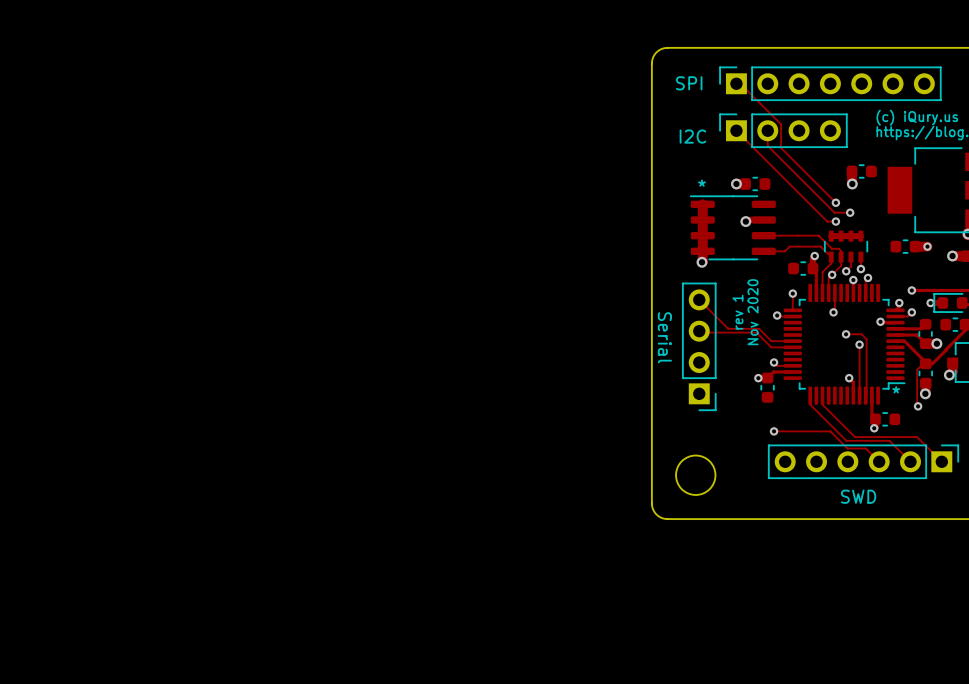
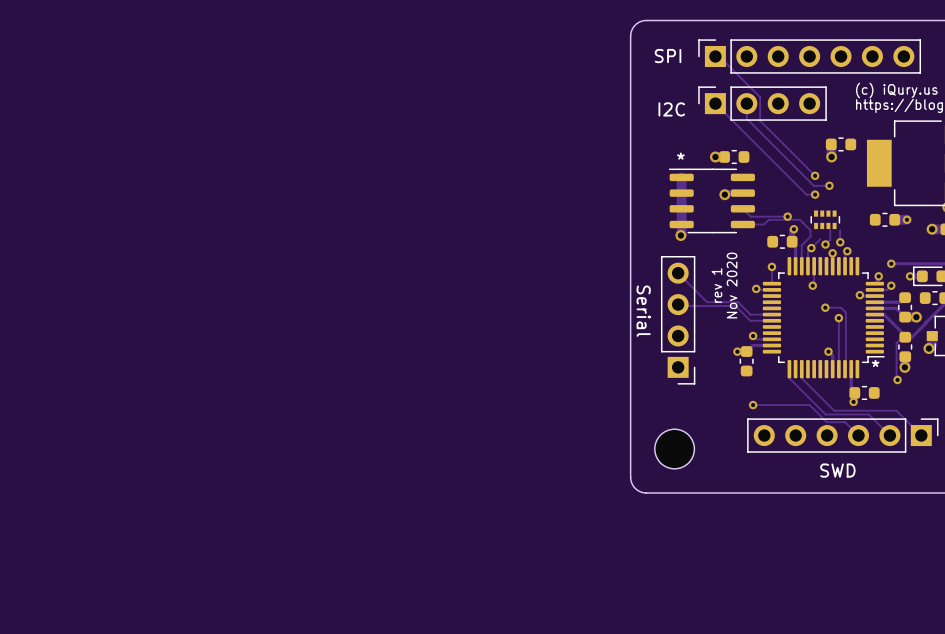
part footprint: [824, 230, 869, 263] -> [810, 210, 841, 230]
track: (763, 235) (818, 235) (831, 248) (838, 248) (841, 251) (841, 265) -> (742, 208) (750, 216) (787, 216)
track: (831, 236) (860, 236) -> none
via: none -> (787, 216)

